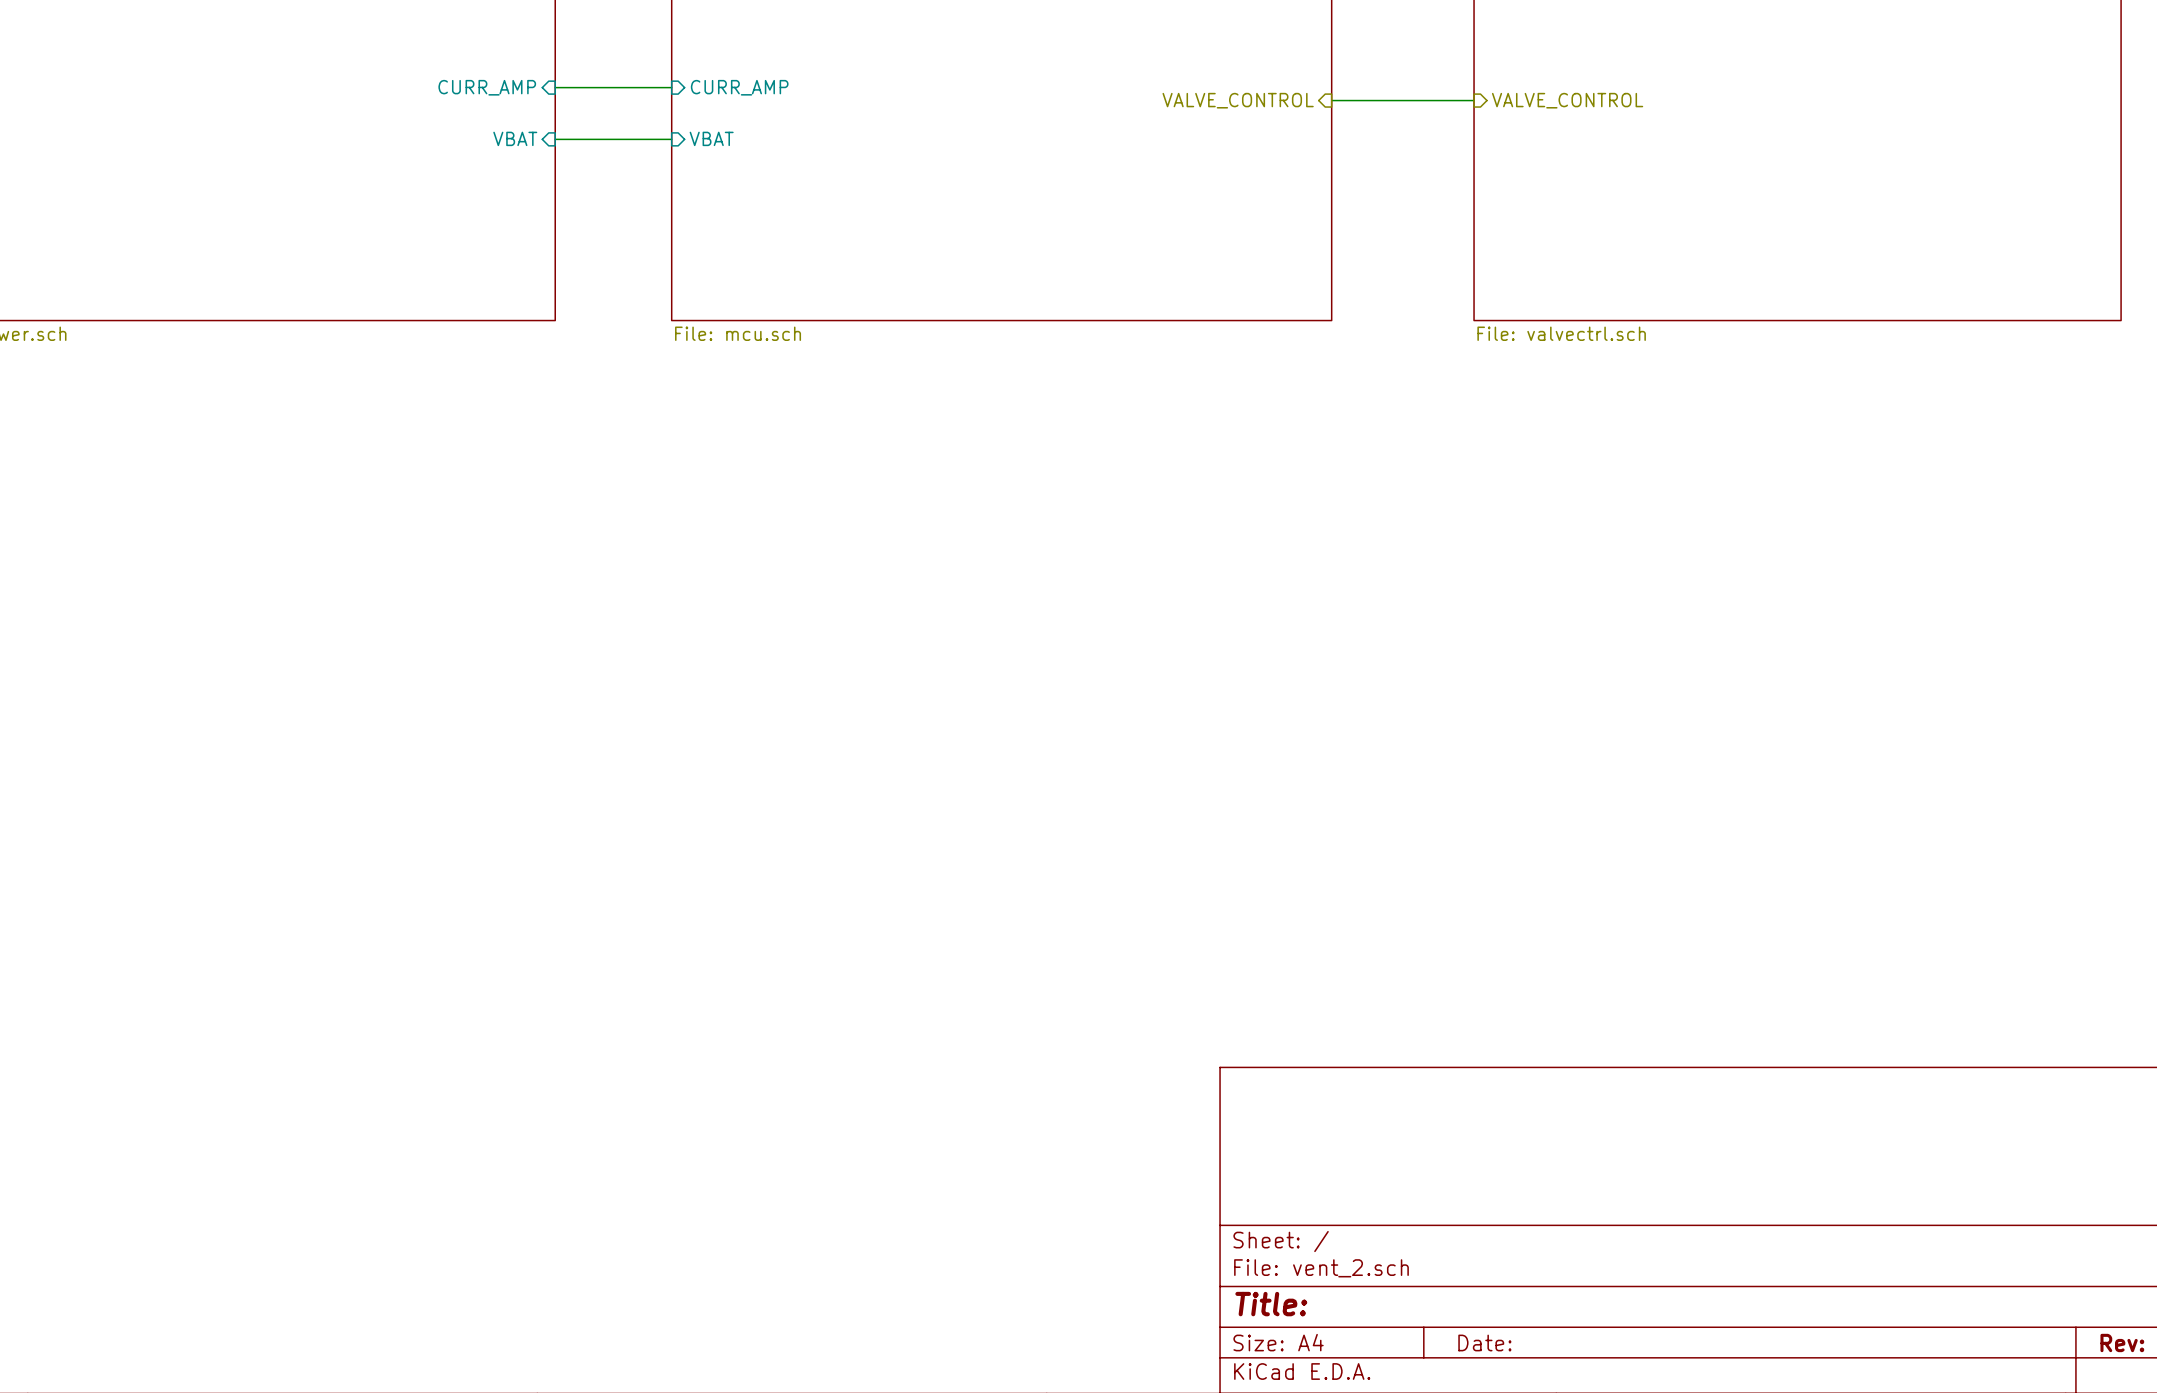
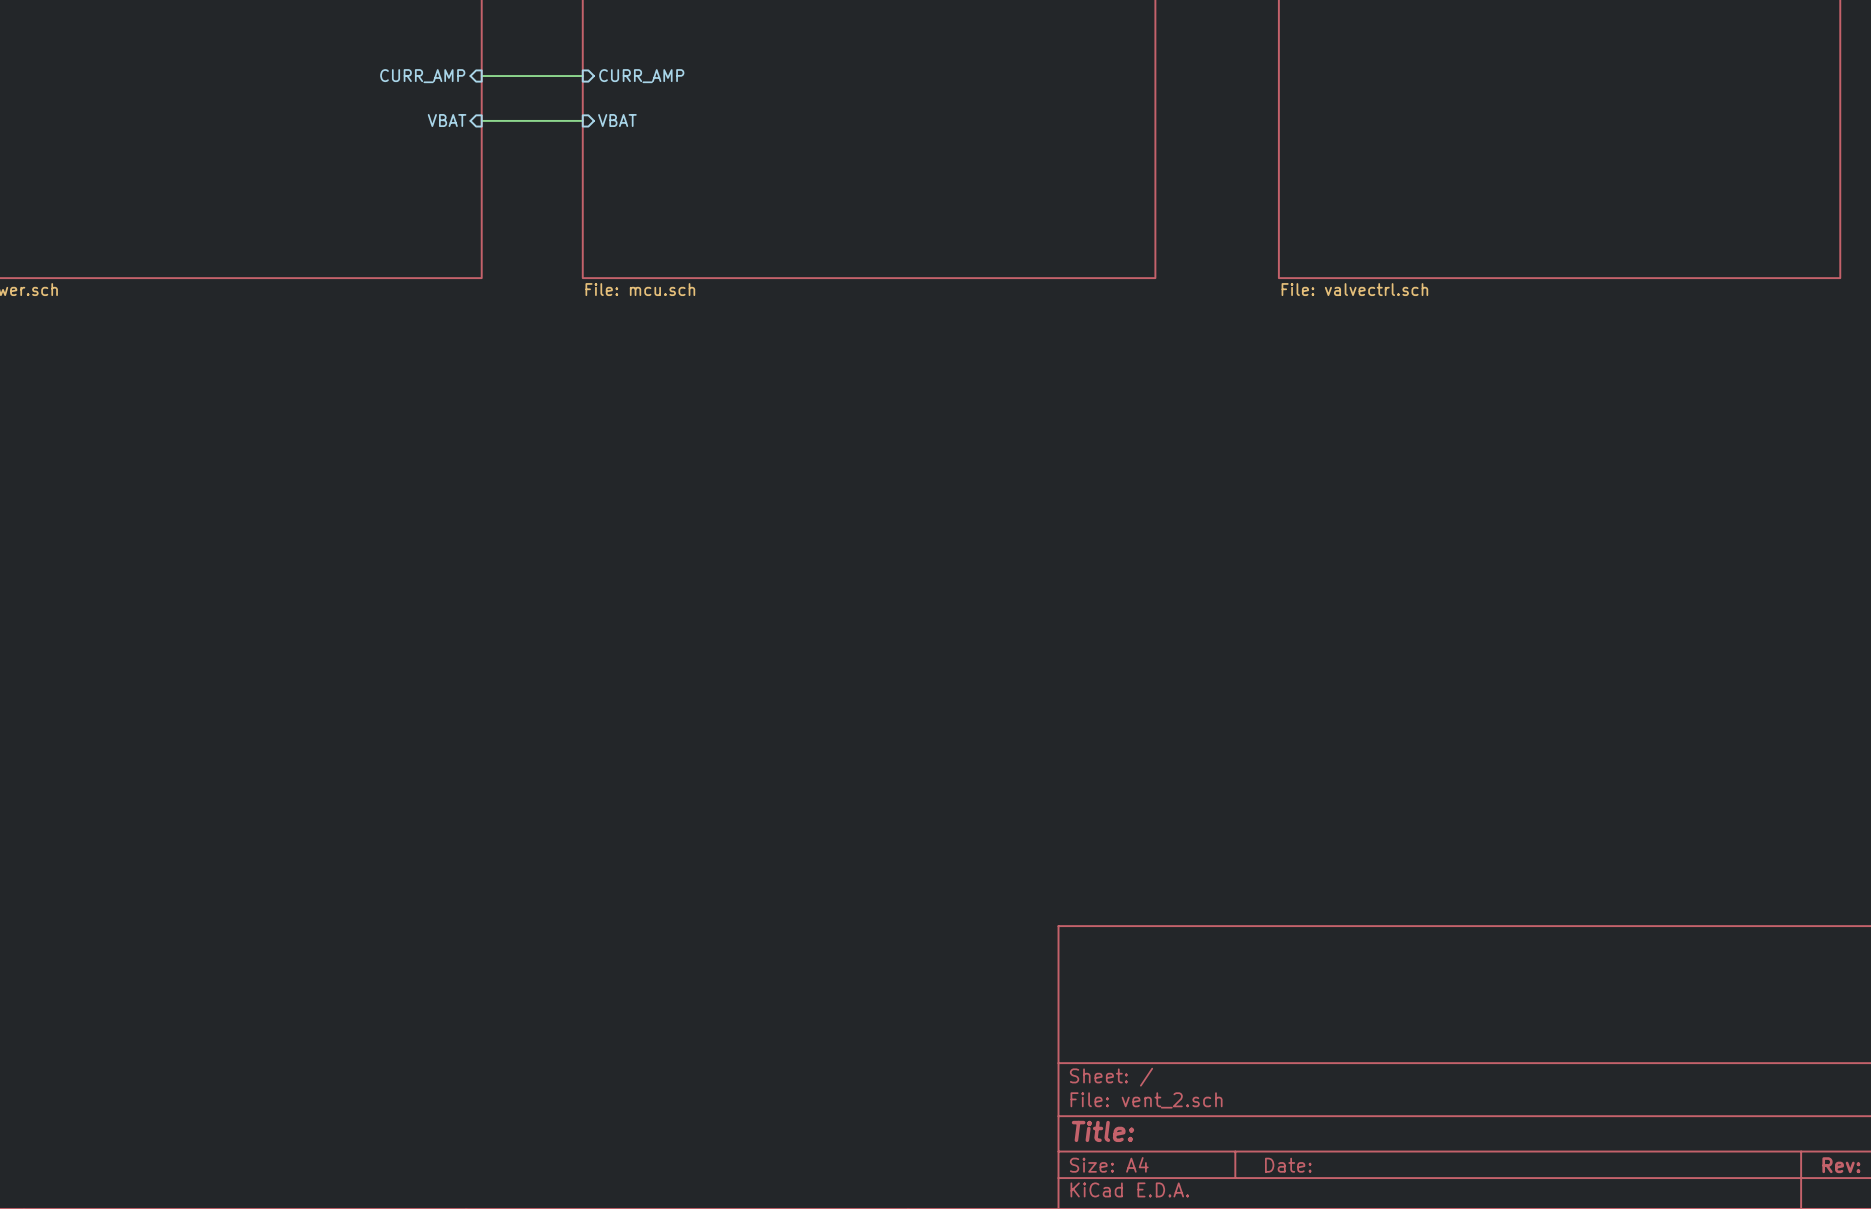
hierarchical label: VALVE_CONTROL (1238, 100) -> none
wire: (1331, 100) (1474, 100) -> none
hierarchical label: VALVE_CONTROL (1567, 100) -> none

